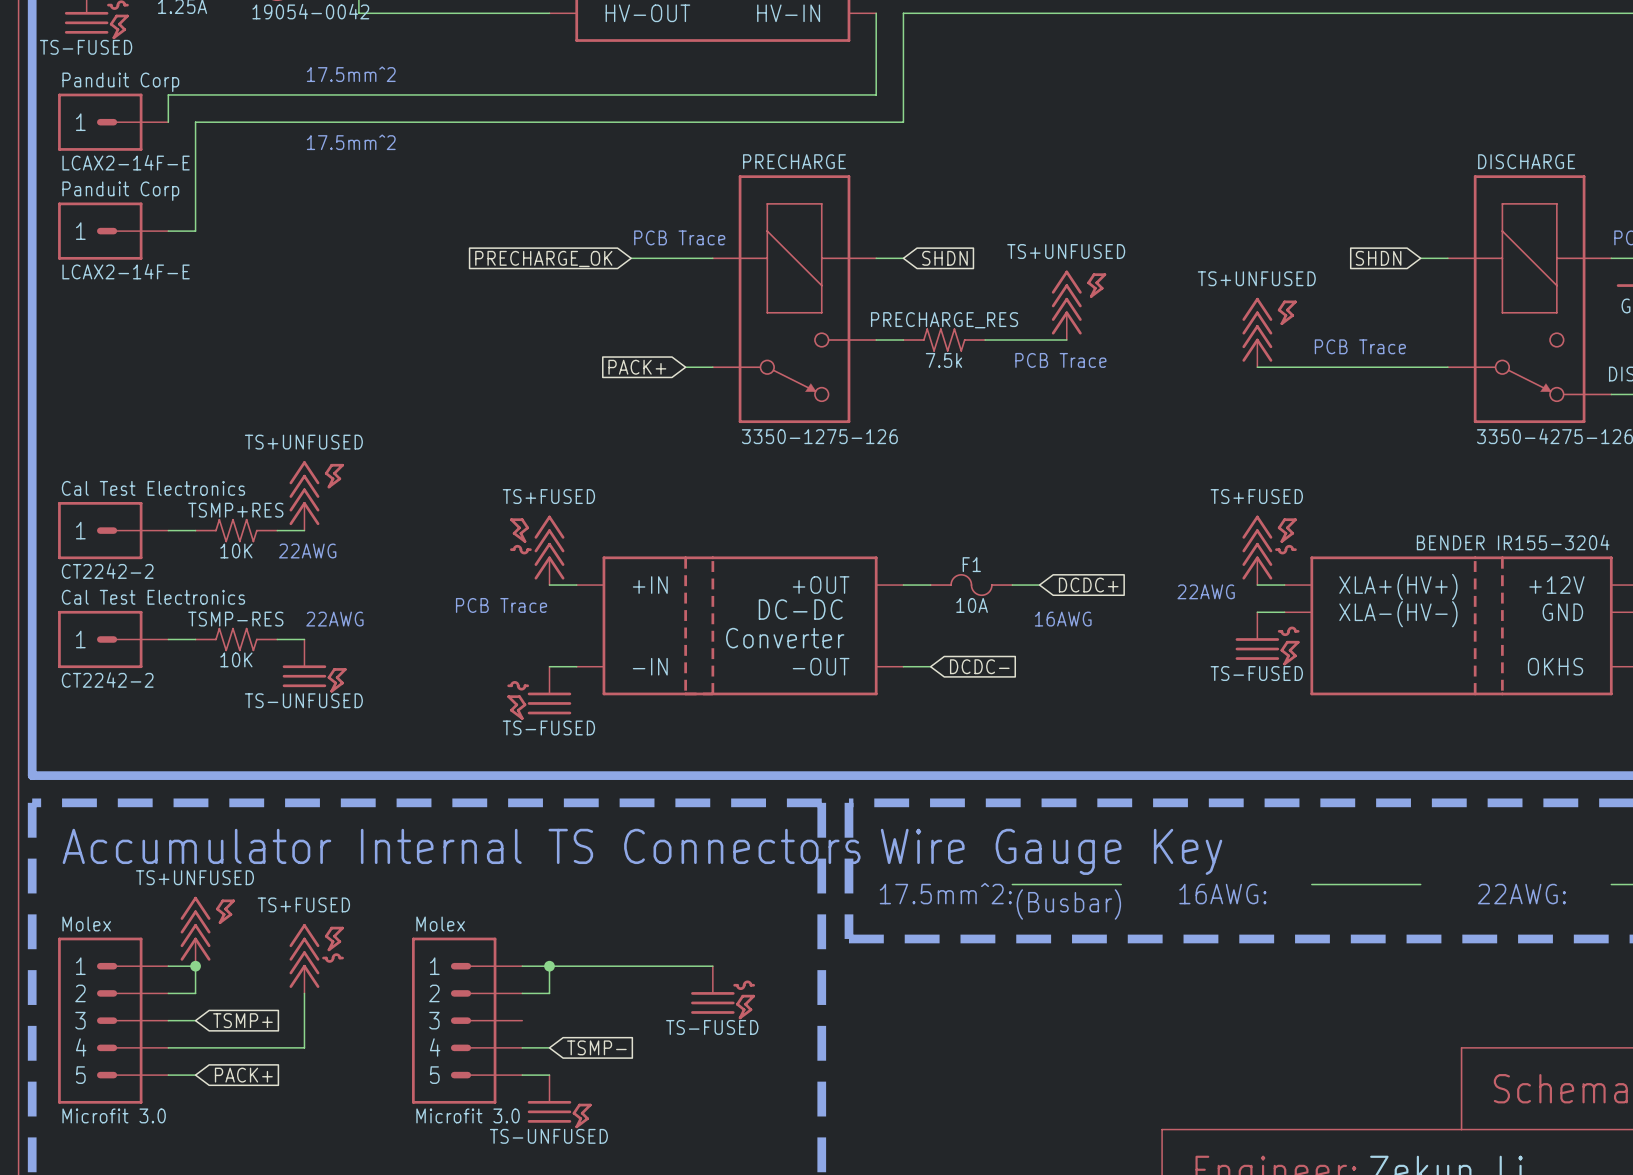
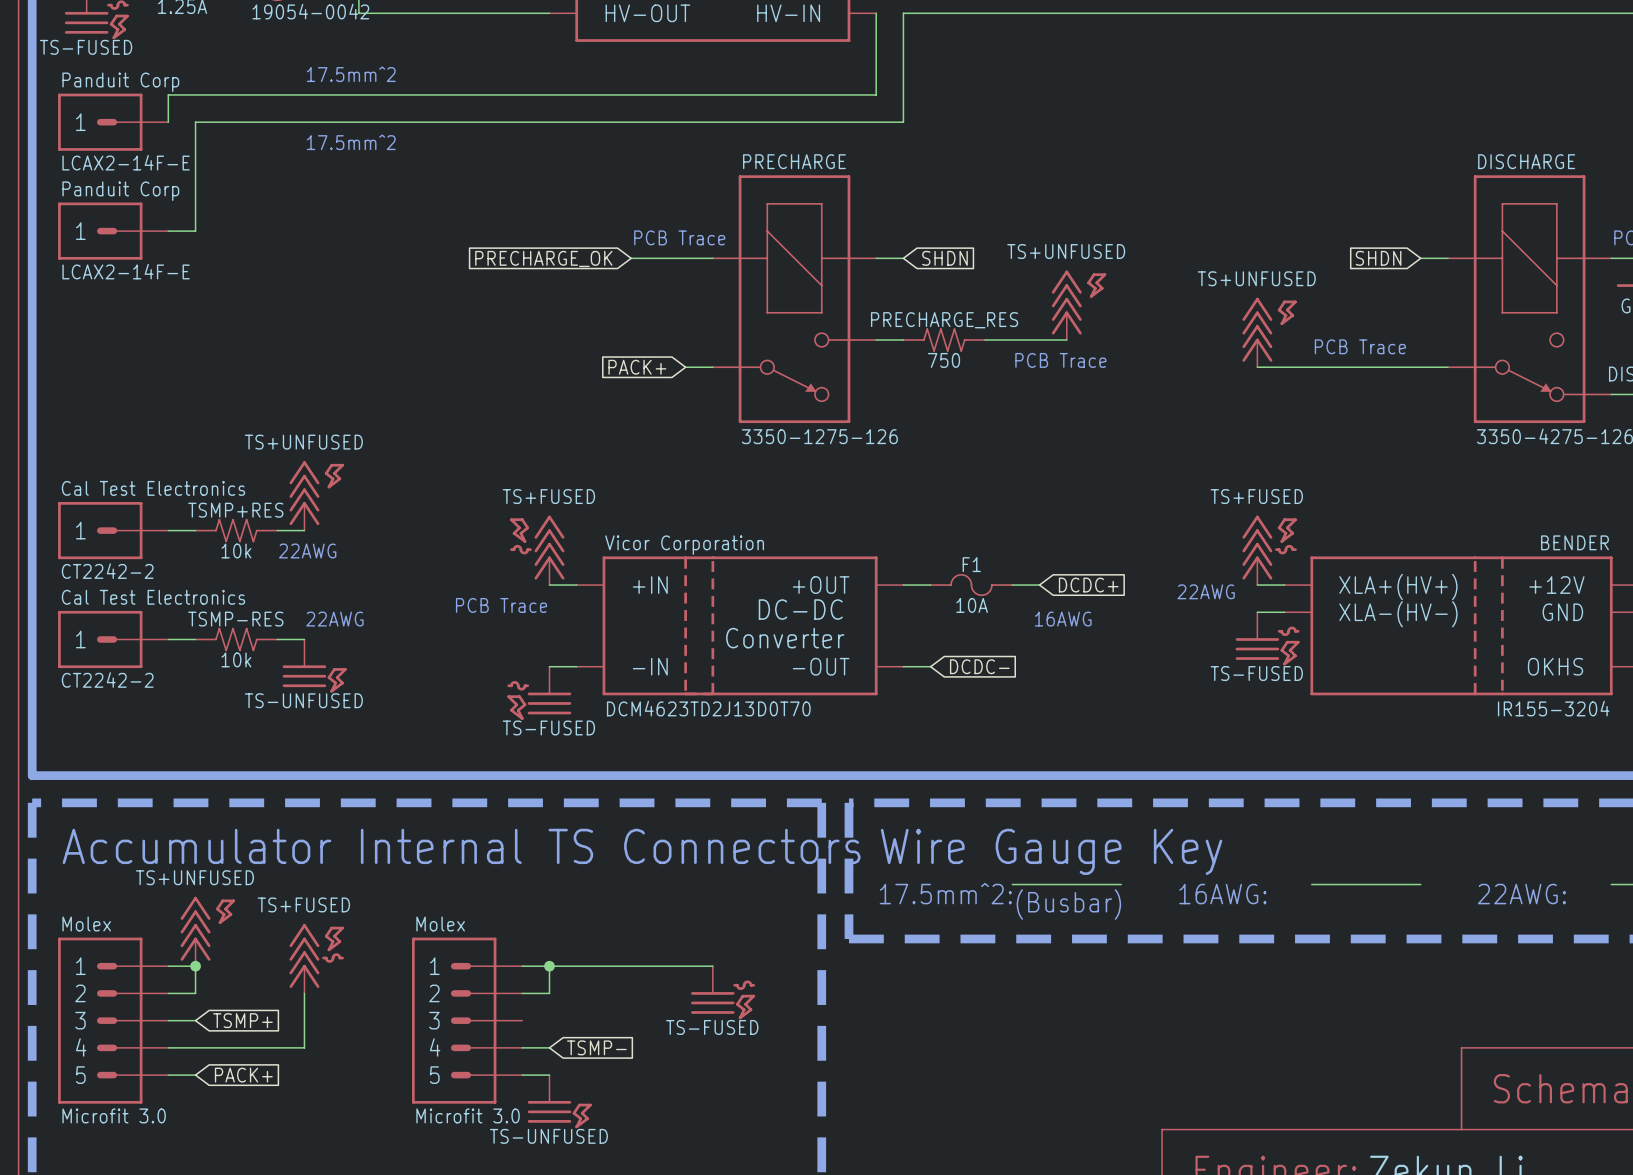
PRECHARGE_RES value: 7.5k (943, 360) -> 750 (943, 360)
part text: BENDER IR155-3204 (1513, 542) -> BENDER (1574, 542)
part text: none -> Vicor Corporation (684, 545)
TSMP+RES value: 10K (236, 551) -> 10k (236, 551)
TSMP-RES value: 10K (236, 659) -> 10k (236, 659)
part text: none -> DCM4623TD2J13D0T70 (708, 708)
part text: none -> IR155-3204 (1553, 708)

